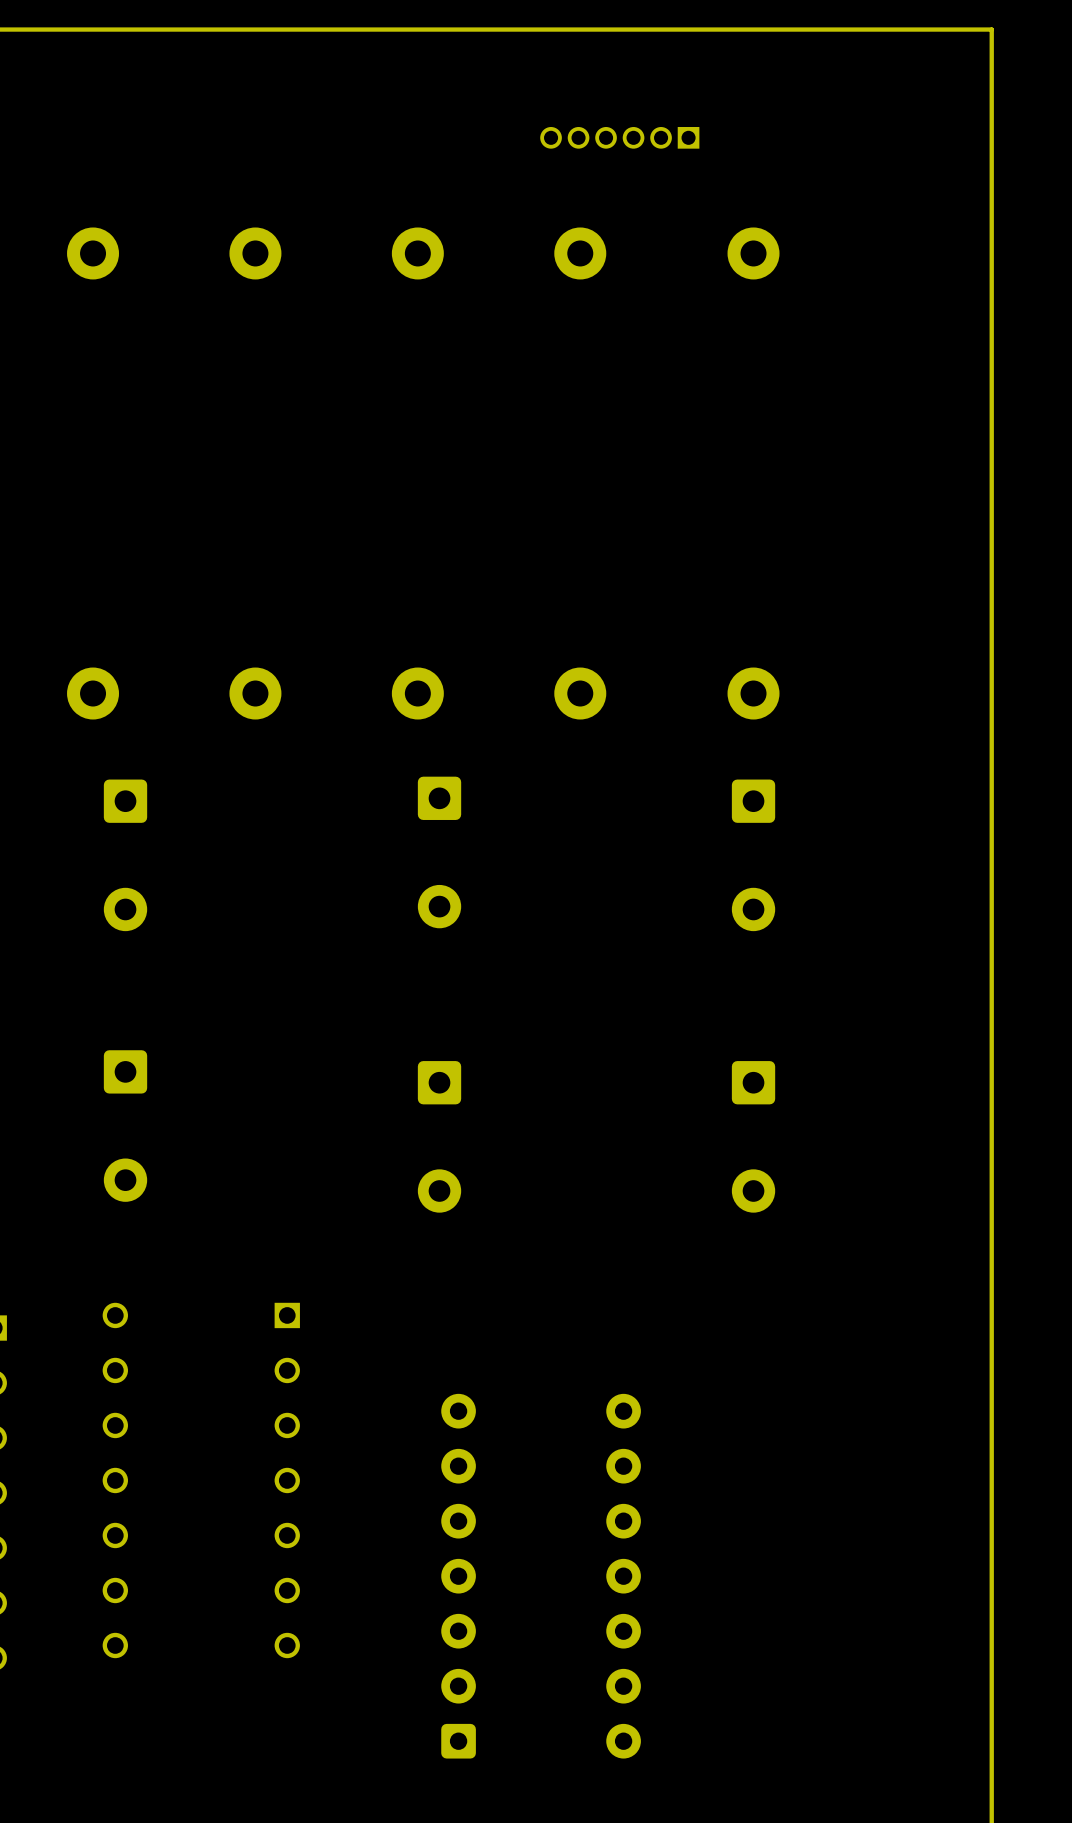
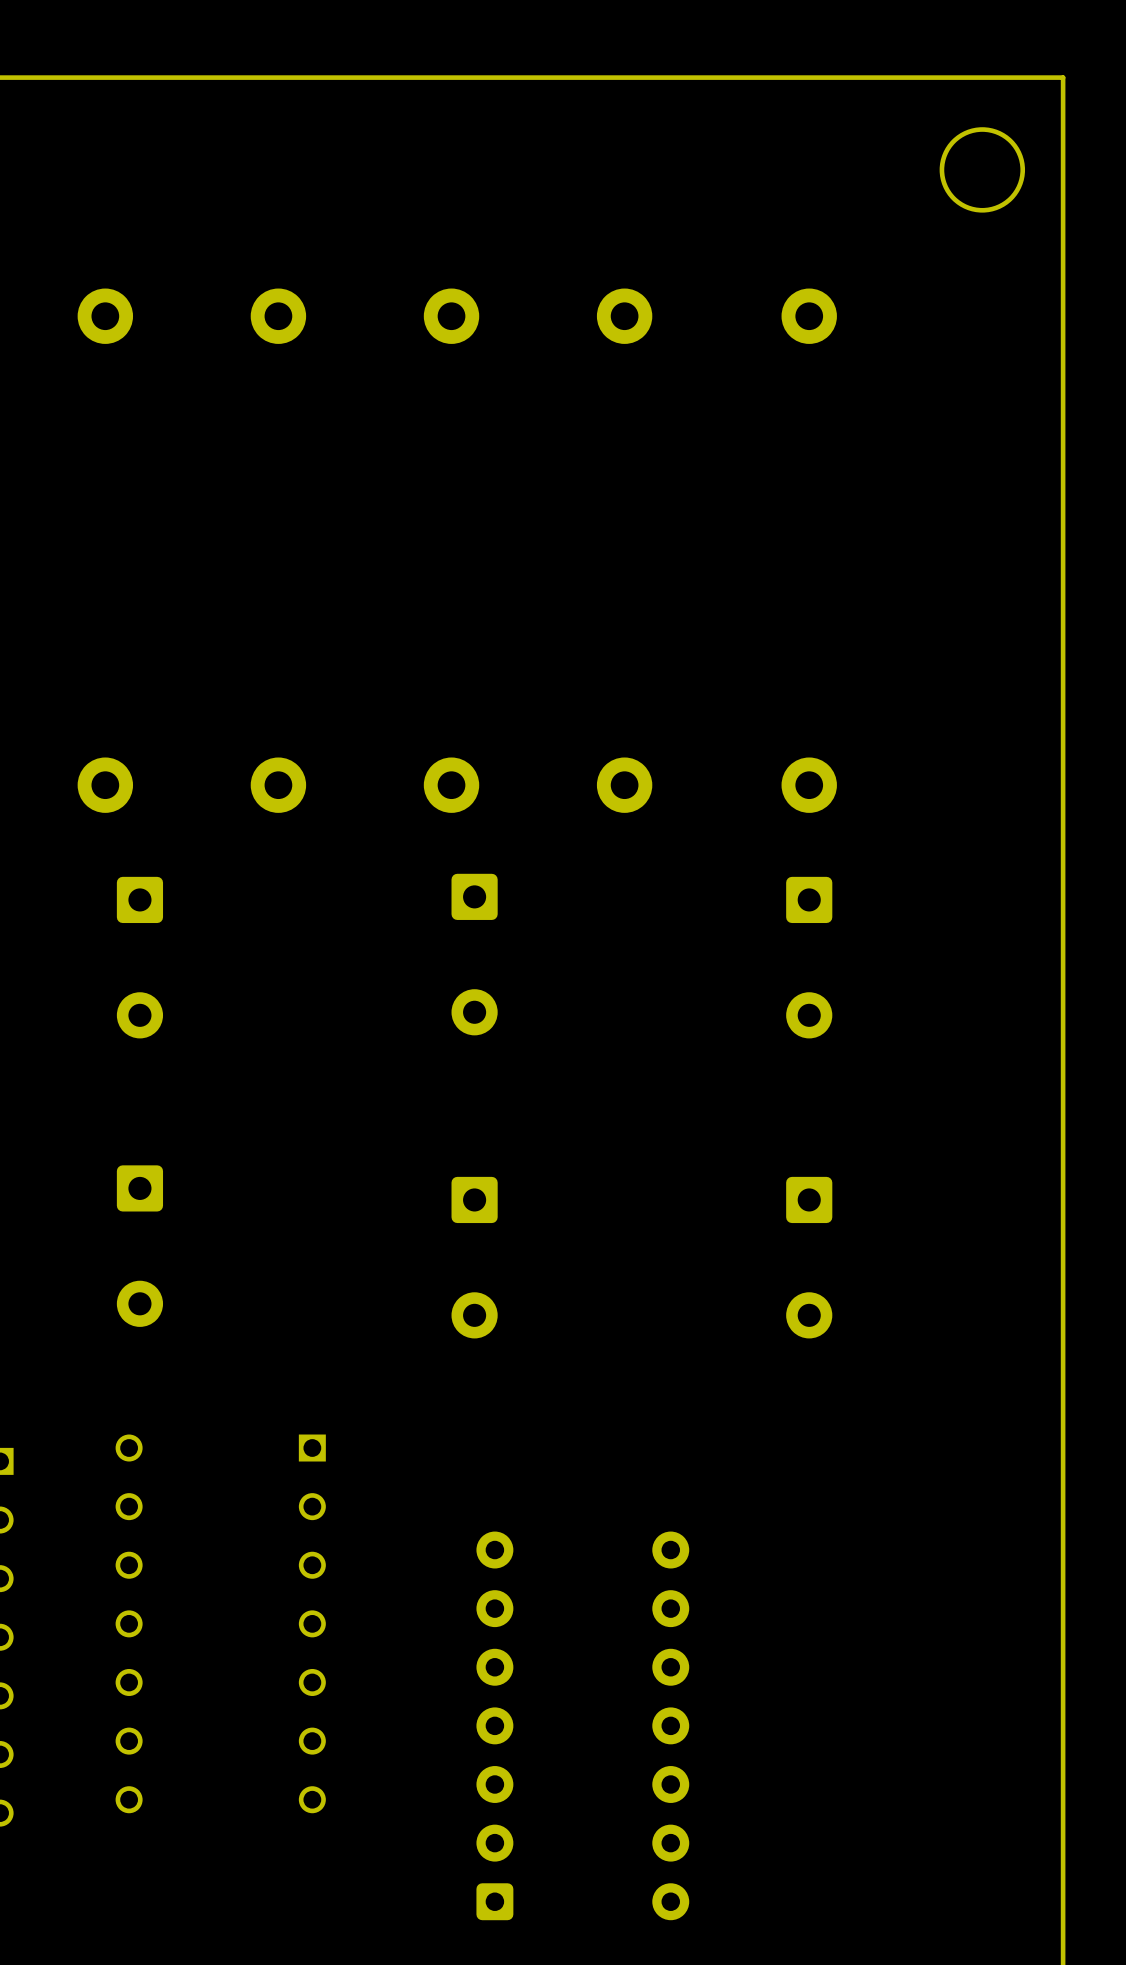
round board edge: none -> [939, 127, 1026, 213]
part: (619, 137) -> none

